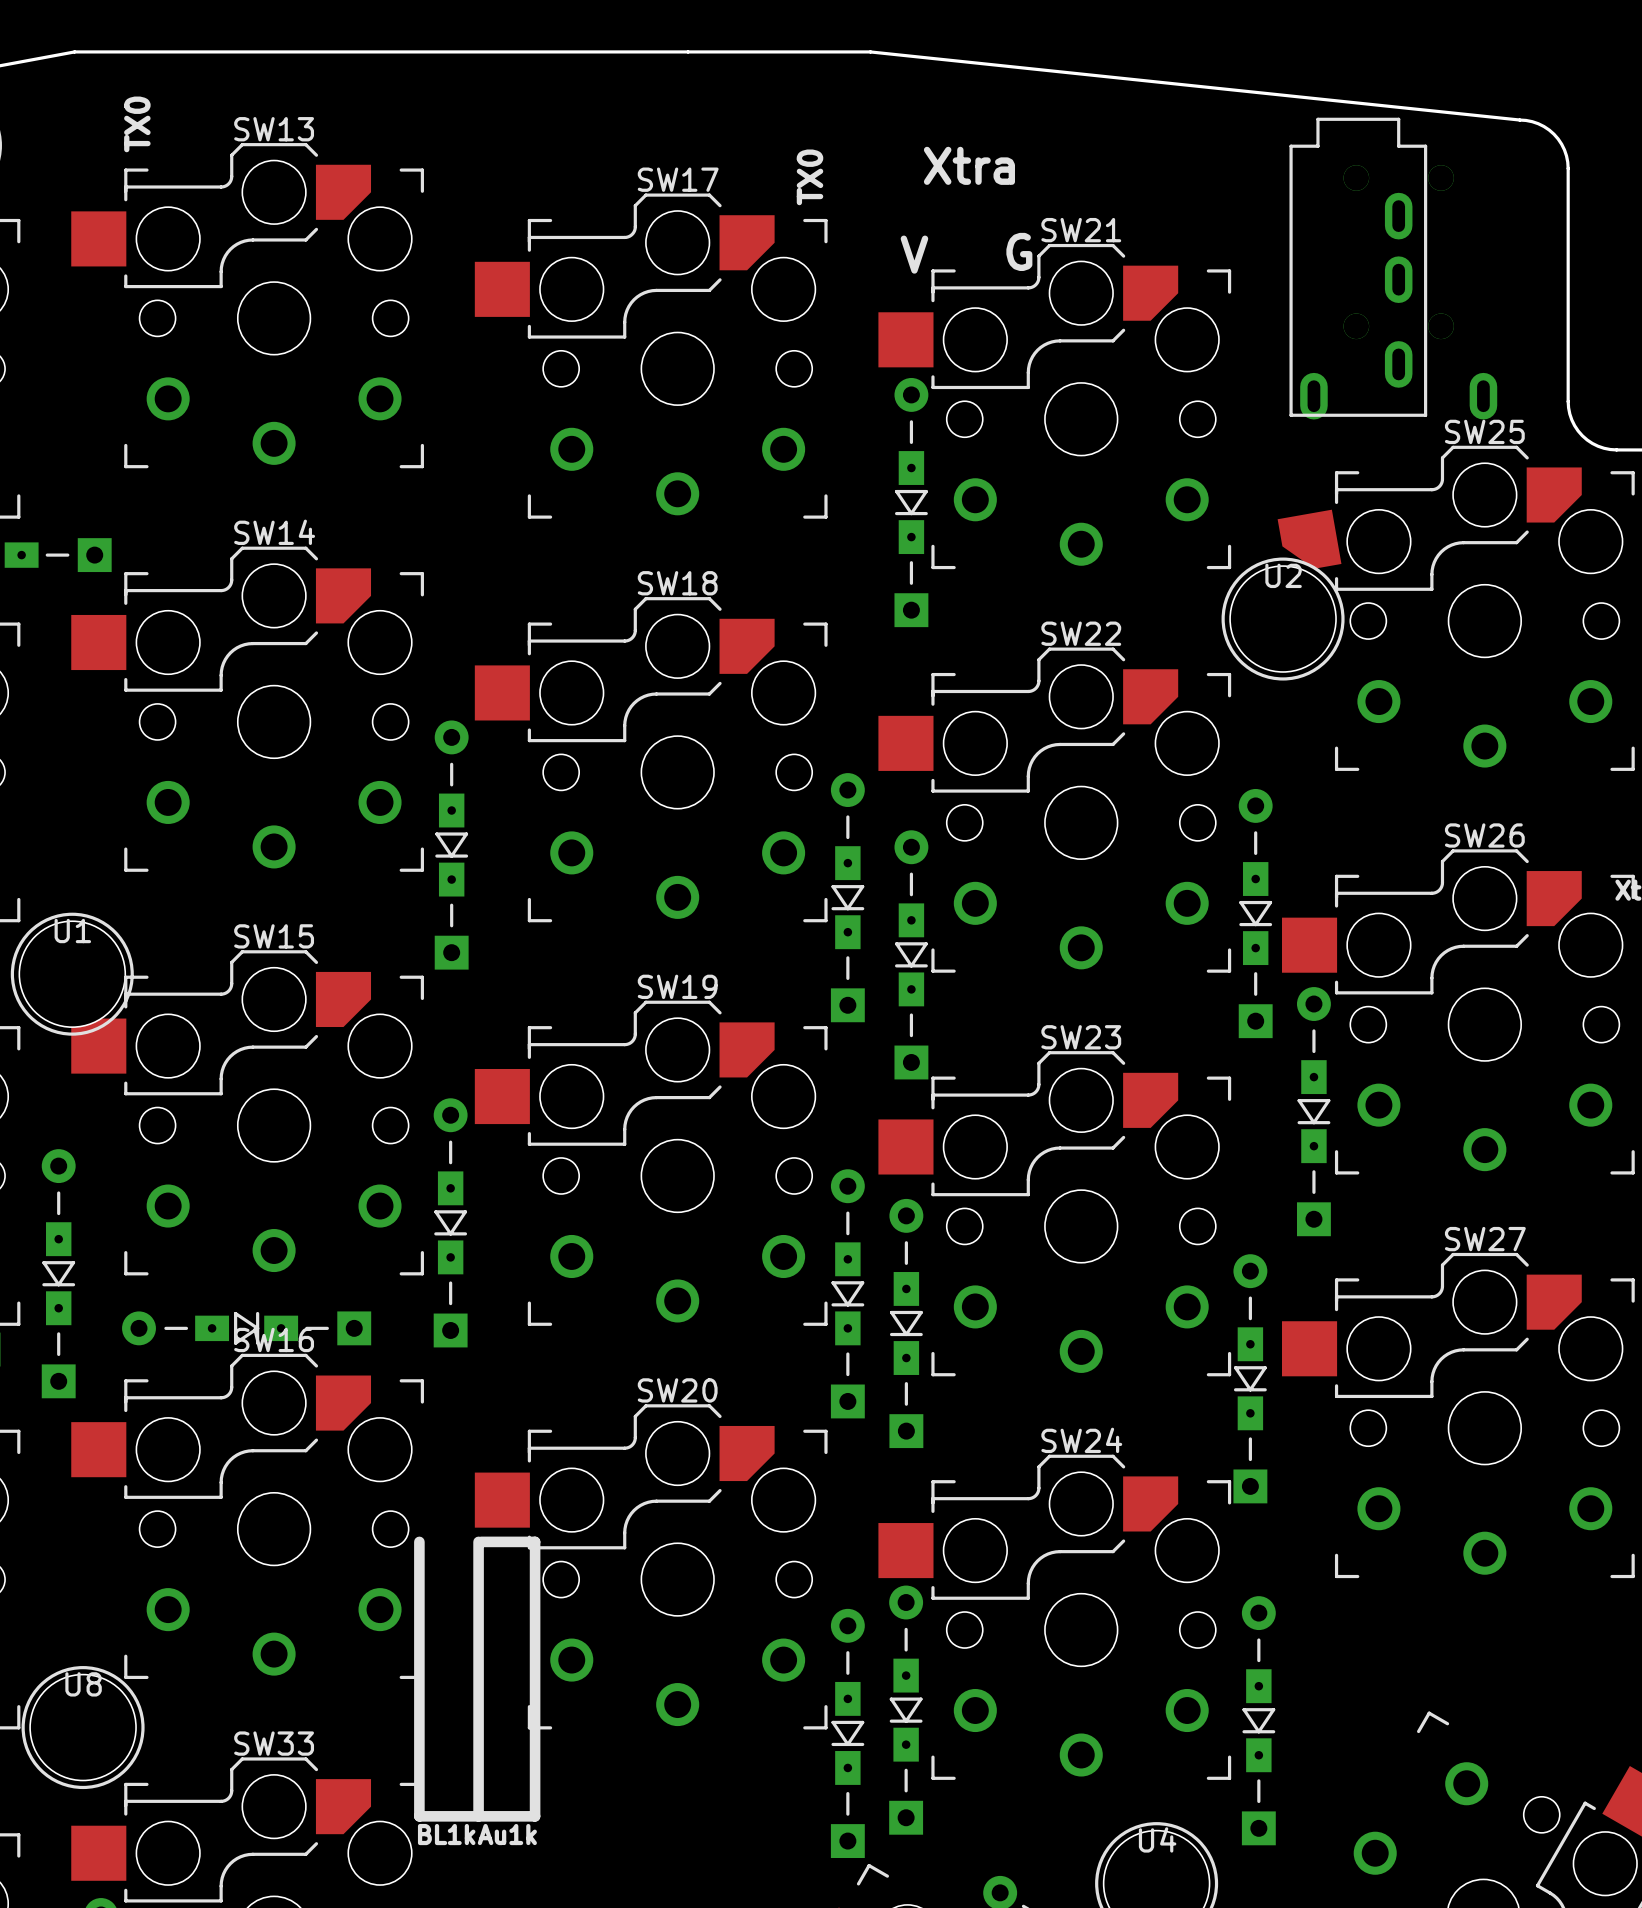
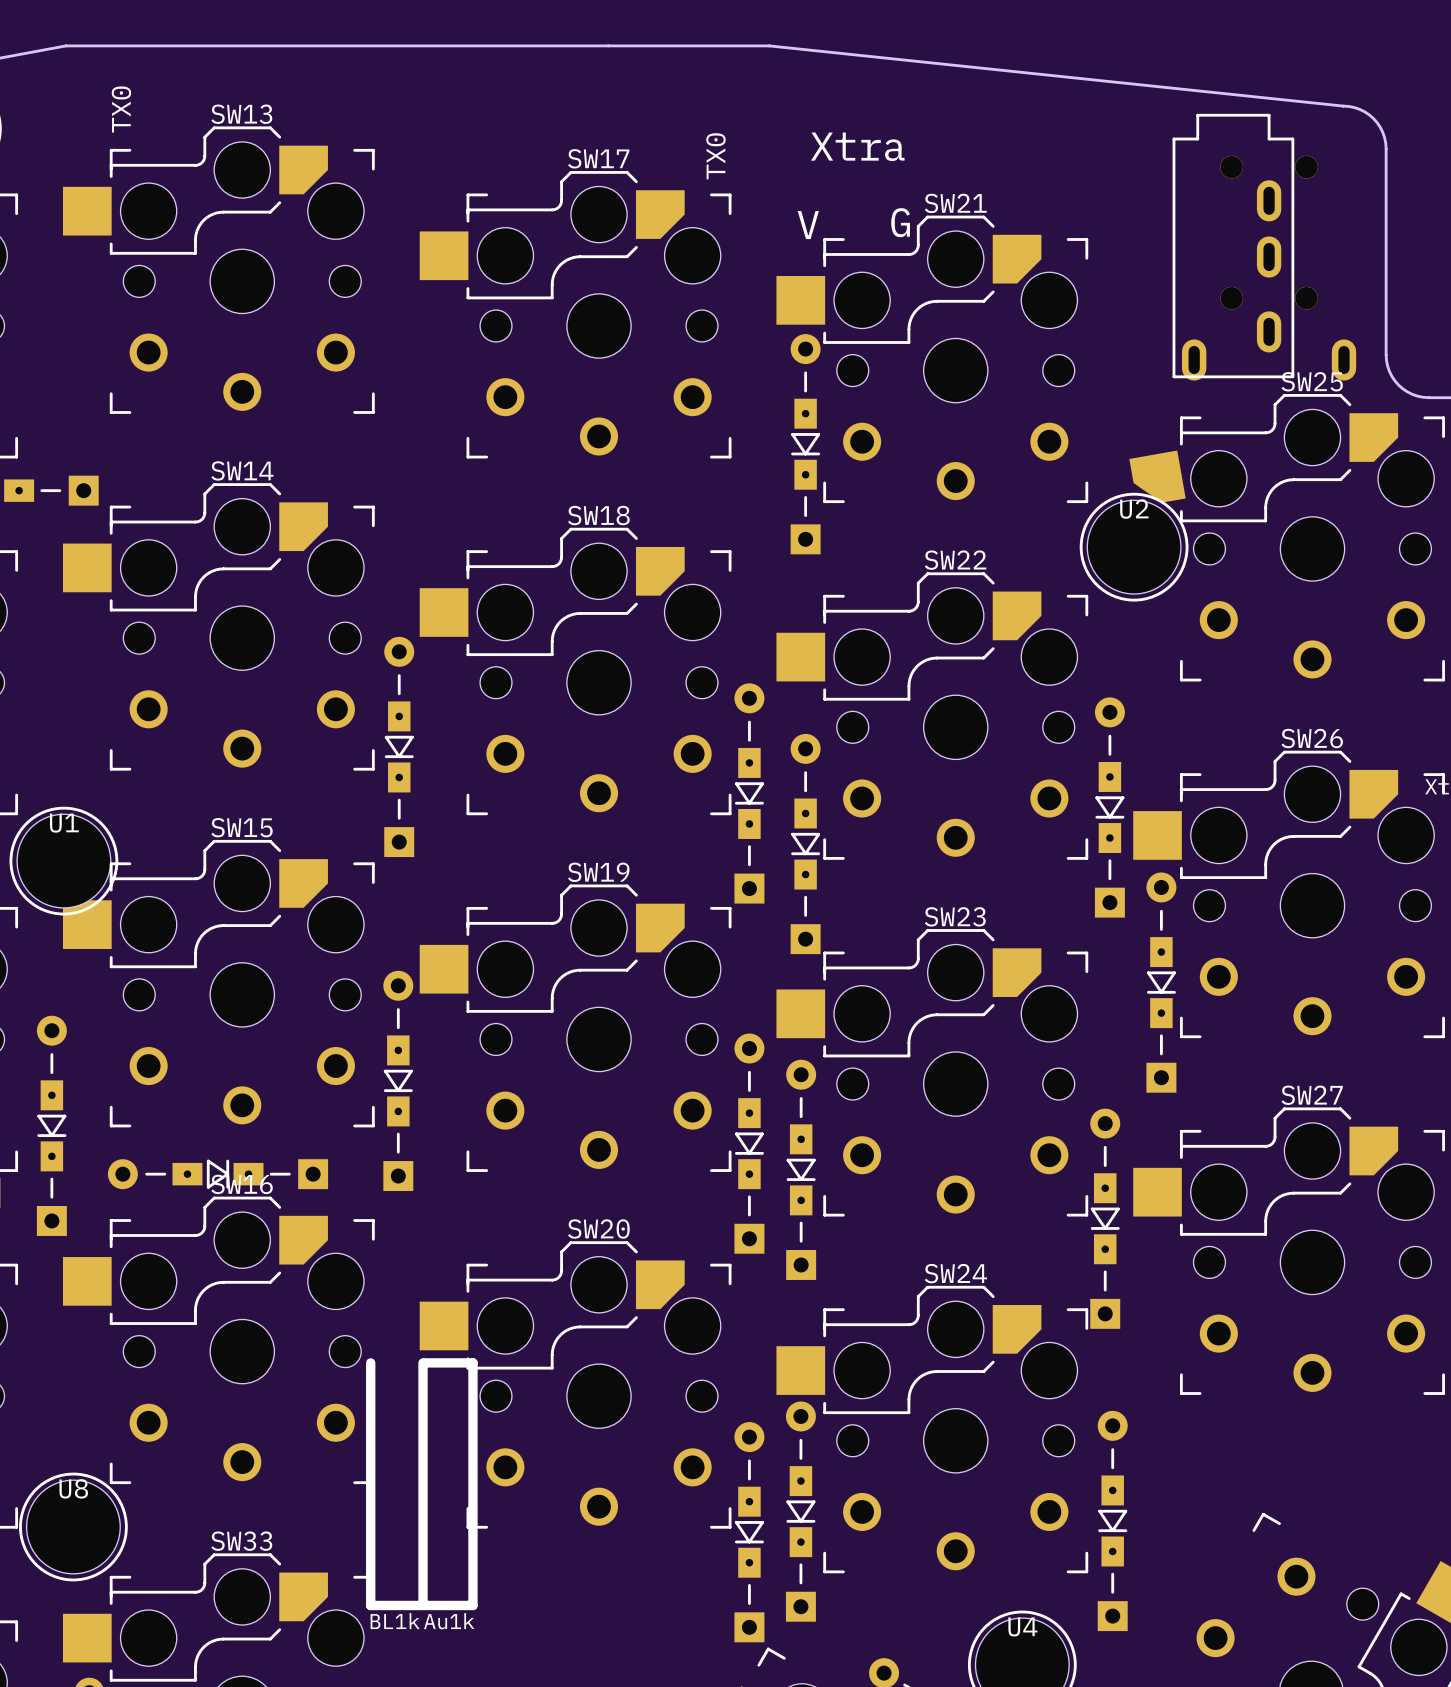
part position: (1393, 268) -> (1264, 247)

